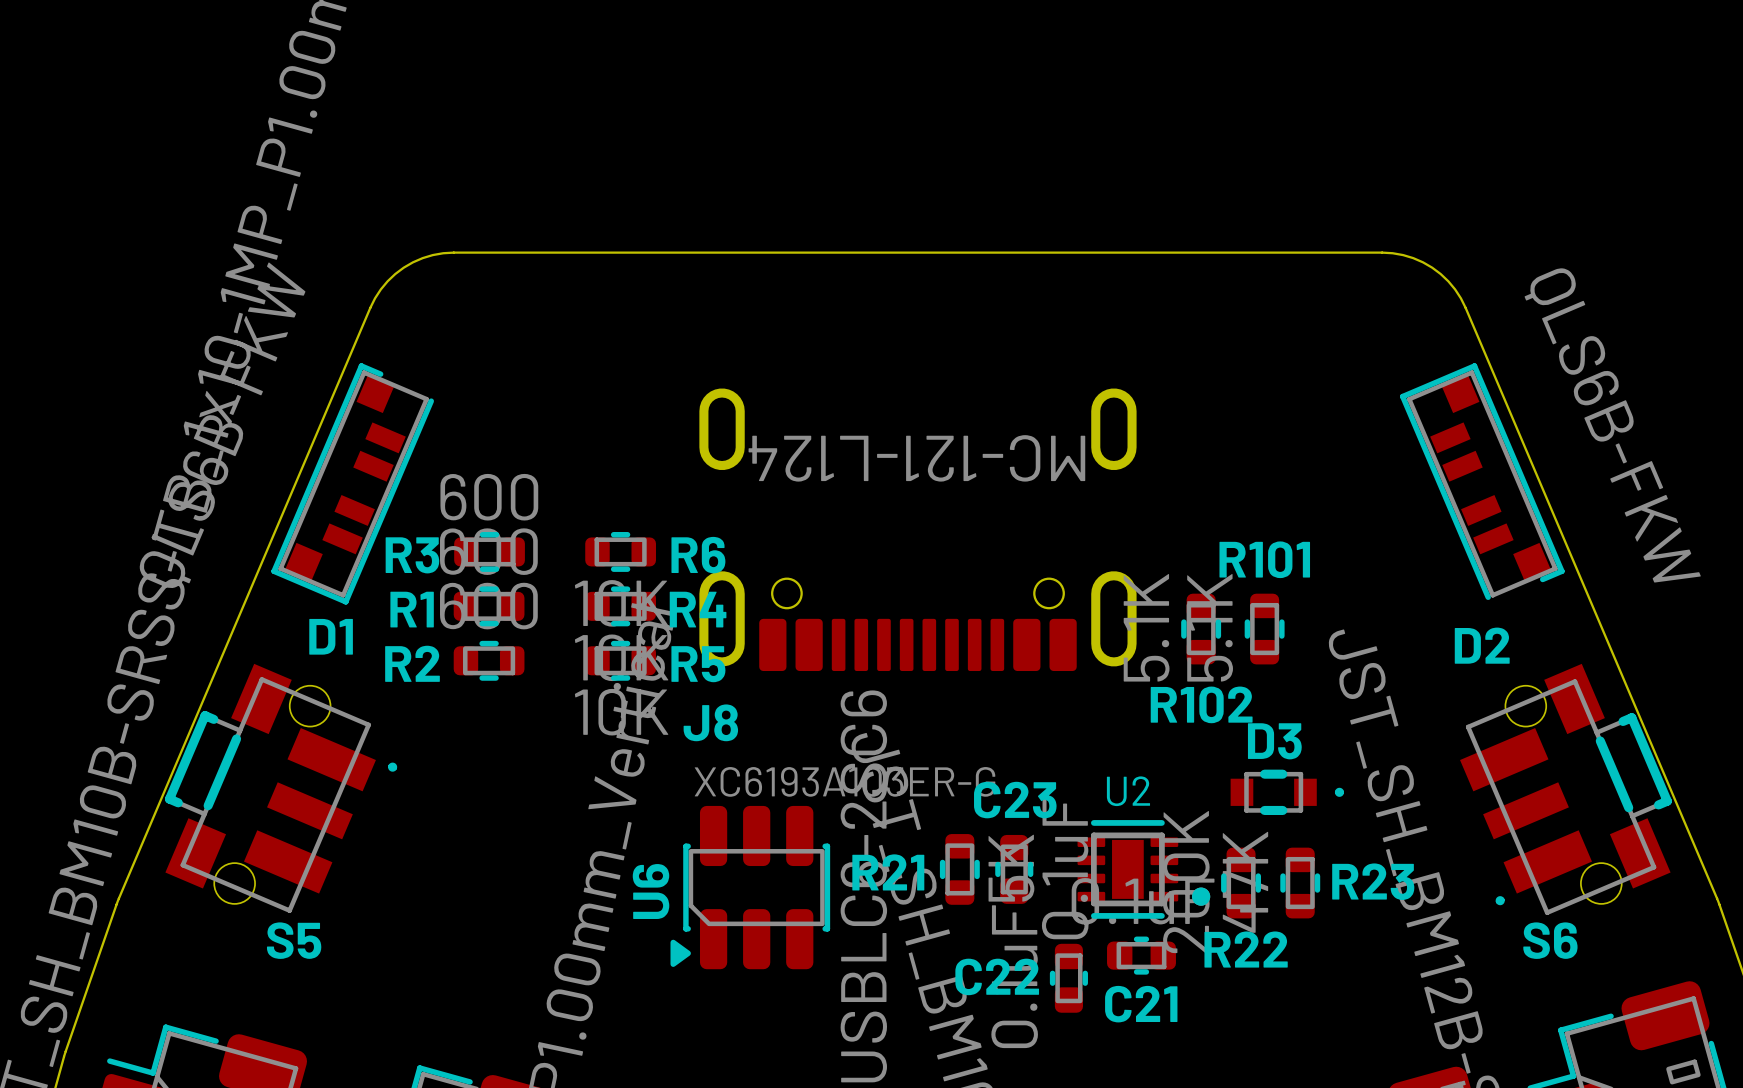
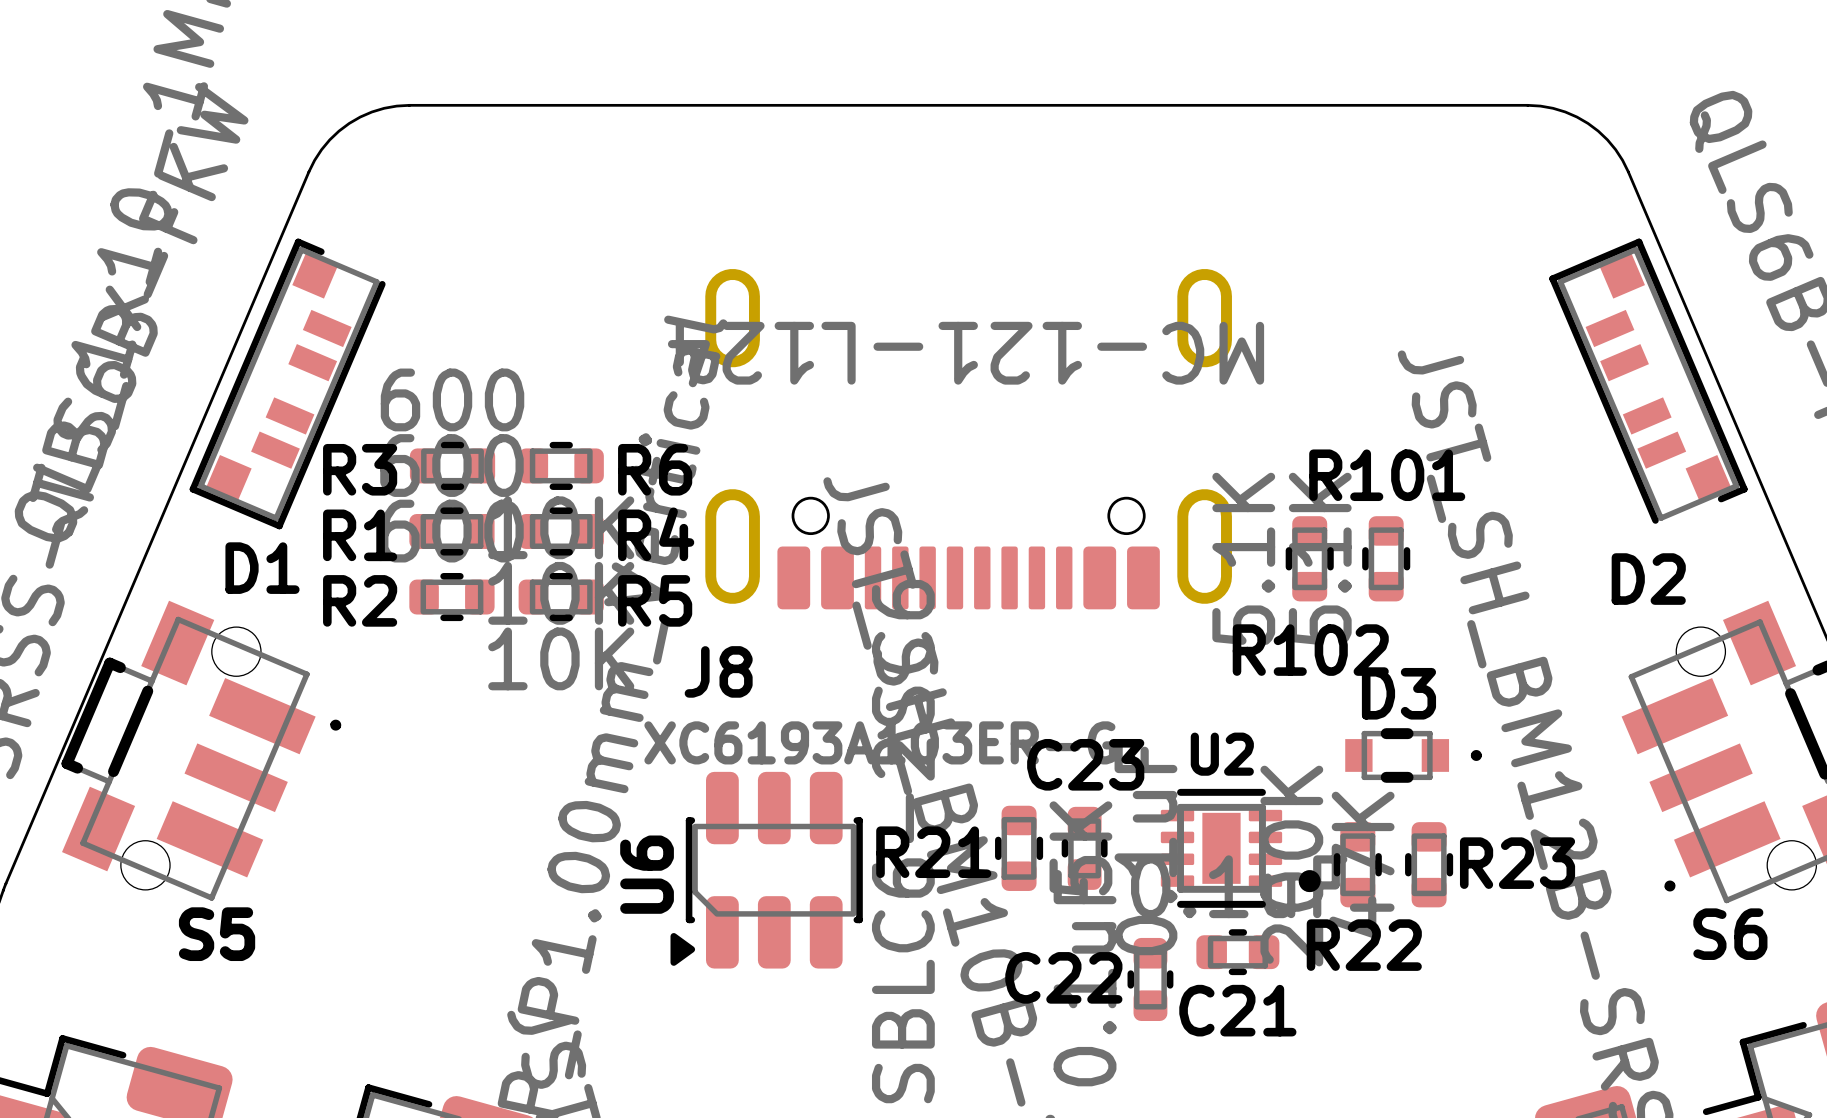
R6 position: (620, 551) -> (561, 465)
R4 position: (620, 606) -> (561, 531)
R5 position: (620, 660) -> (561, 597)

